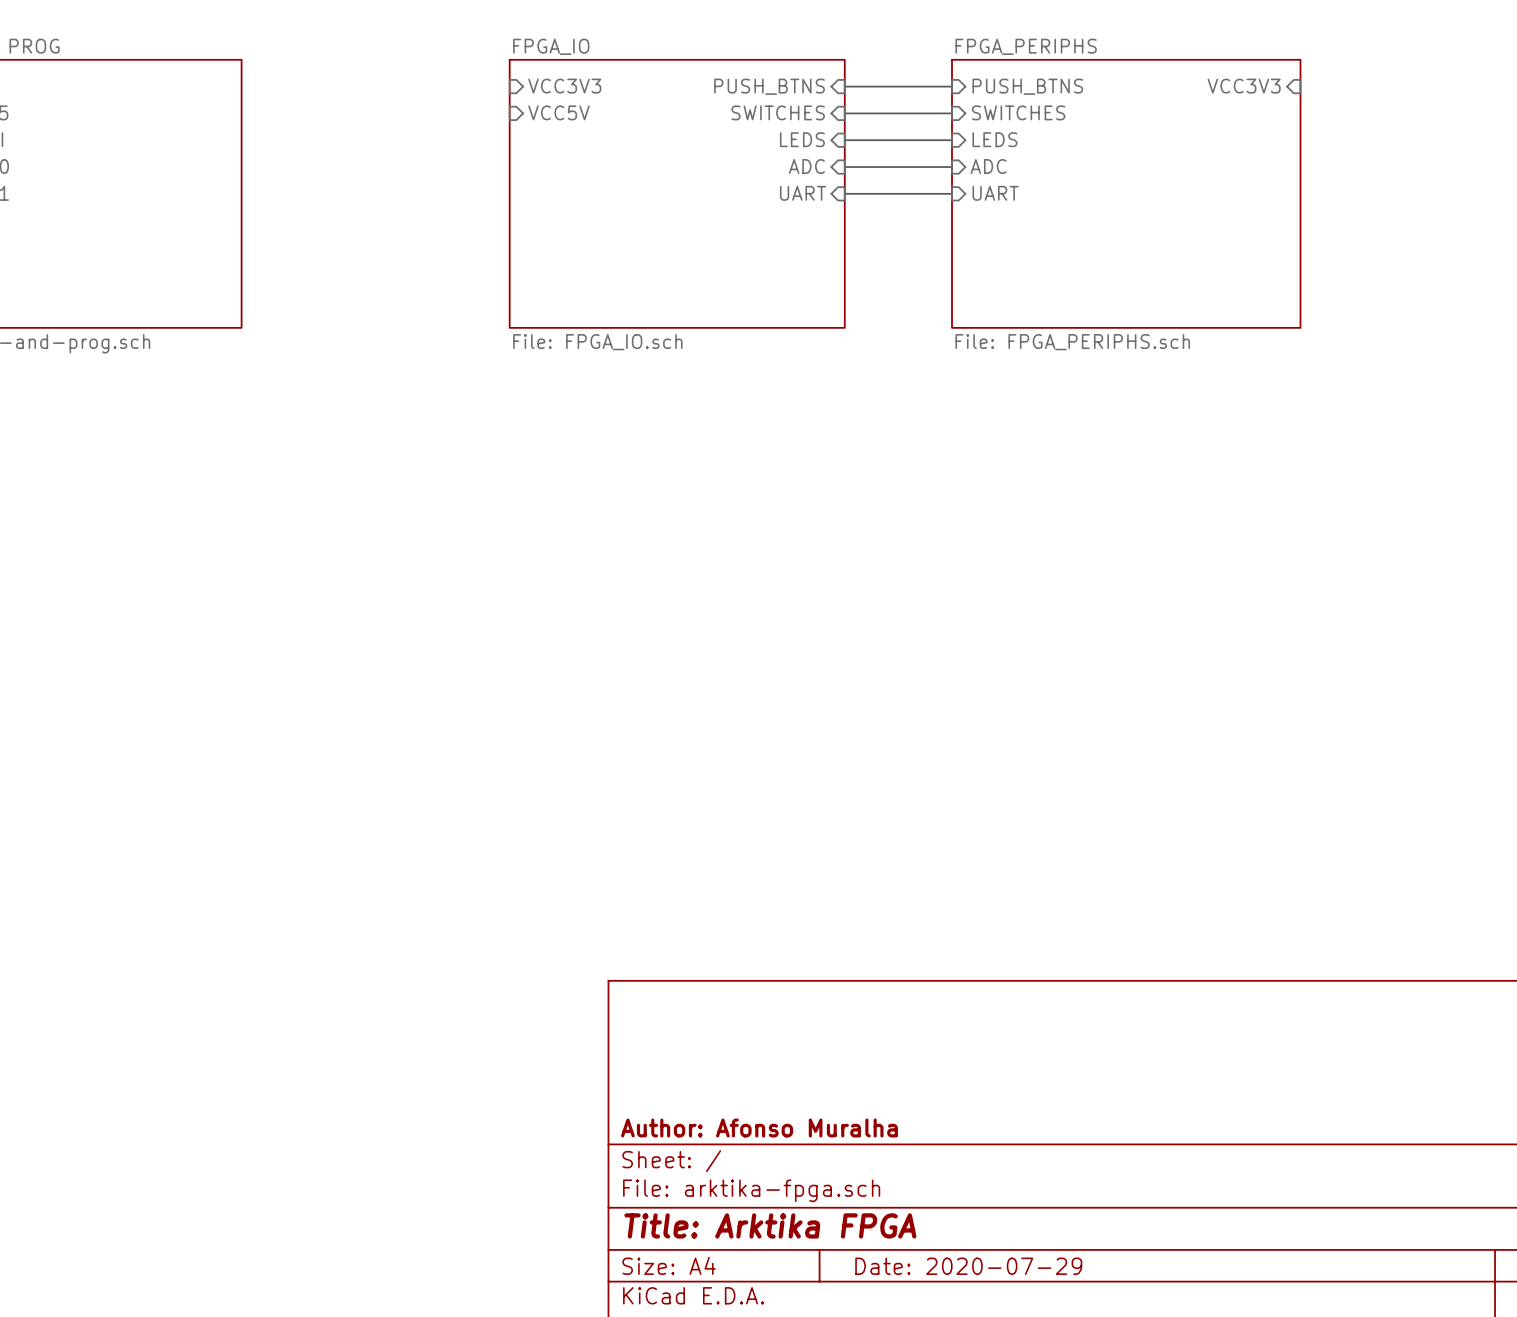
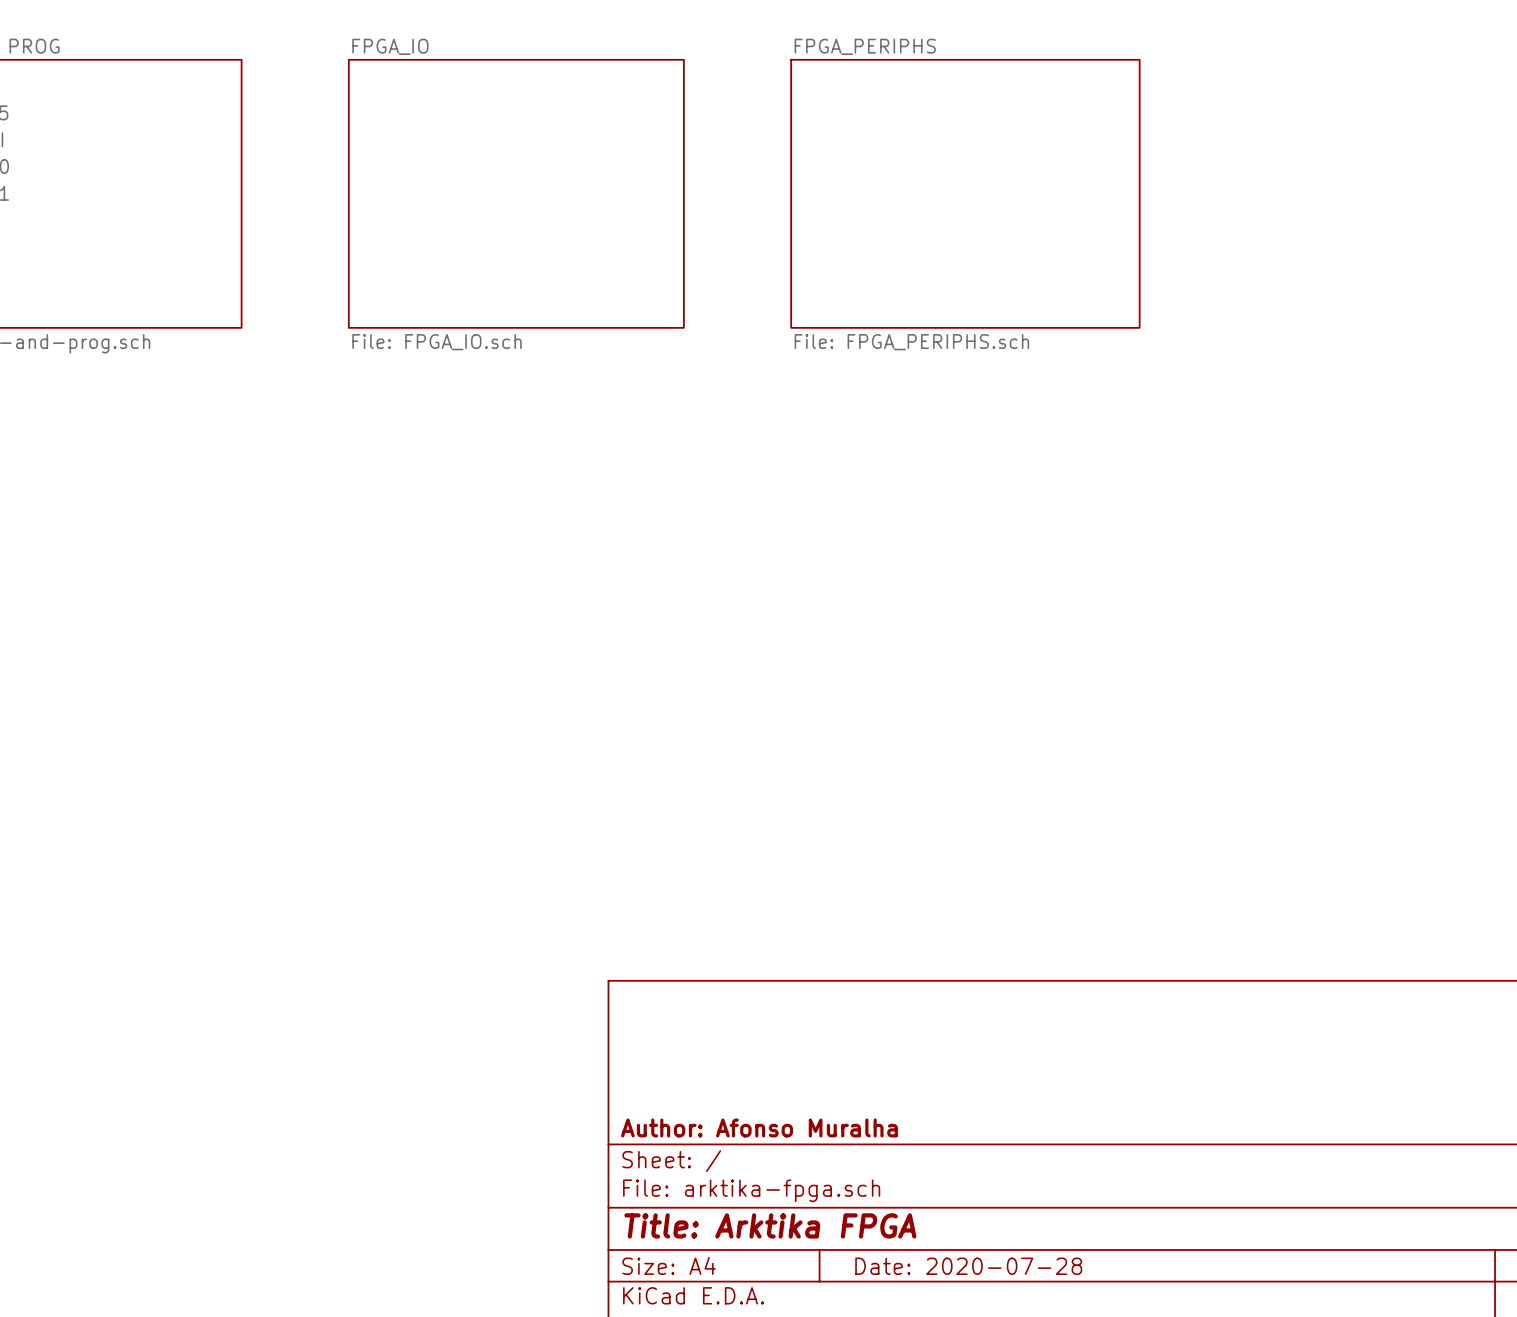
sheet pin: VCC3V3 (564, 86) -> none
sheet pin: PUSH_BTNS (769, 86) -> none
bus: (844, 86) (951, 86) -> none
sheet pin: PUSH_BTNS (1027, 86) -> none
sheet pin: VCC3V3 (1244, 86) -> none
sheet pin: VCC5V (559, 112) -> none
sheet pin: SWITCHES (778, 112) -> none
sheet pin: SWITCHES (1018, 112) -> none
bus: (844, 113) (951, 113) -> none
sheet pin: LEDS (802, 139) -> none
sheet pin: LEDS (994, 139) -> none
bus: (844, 140) (951, 140) -> none
sheet pin: ADC (806, 166) -> none
sheet pin: ADC (988, 166) -> none
bus: (844, 167) (951, 167) -> none
sheet FPGA_IO position: (677, 193) -> (516, 193)
sheet pin: UART (803, 193) -> none
bus: (844, 193) (951, 193) -> none
sheet pin: UART (995, 193) -> none
sheet FPGA_PERIPHS position: (1126, 193) -> (965, 193)
title block: Date: 2020-07-29 (968, 1266) -> Date: 2020-07-28 (968, 1266)

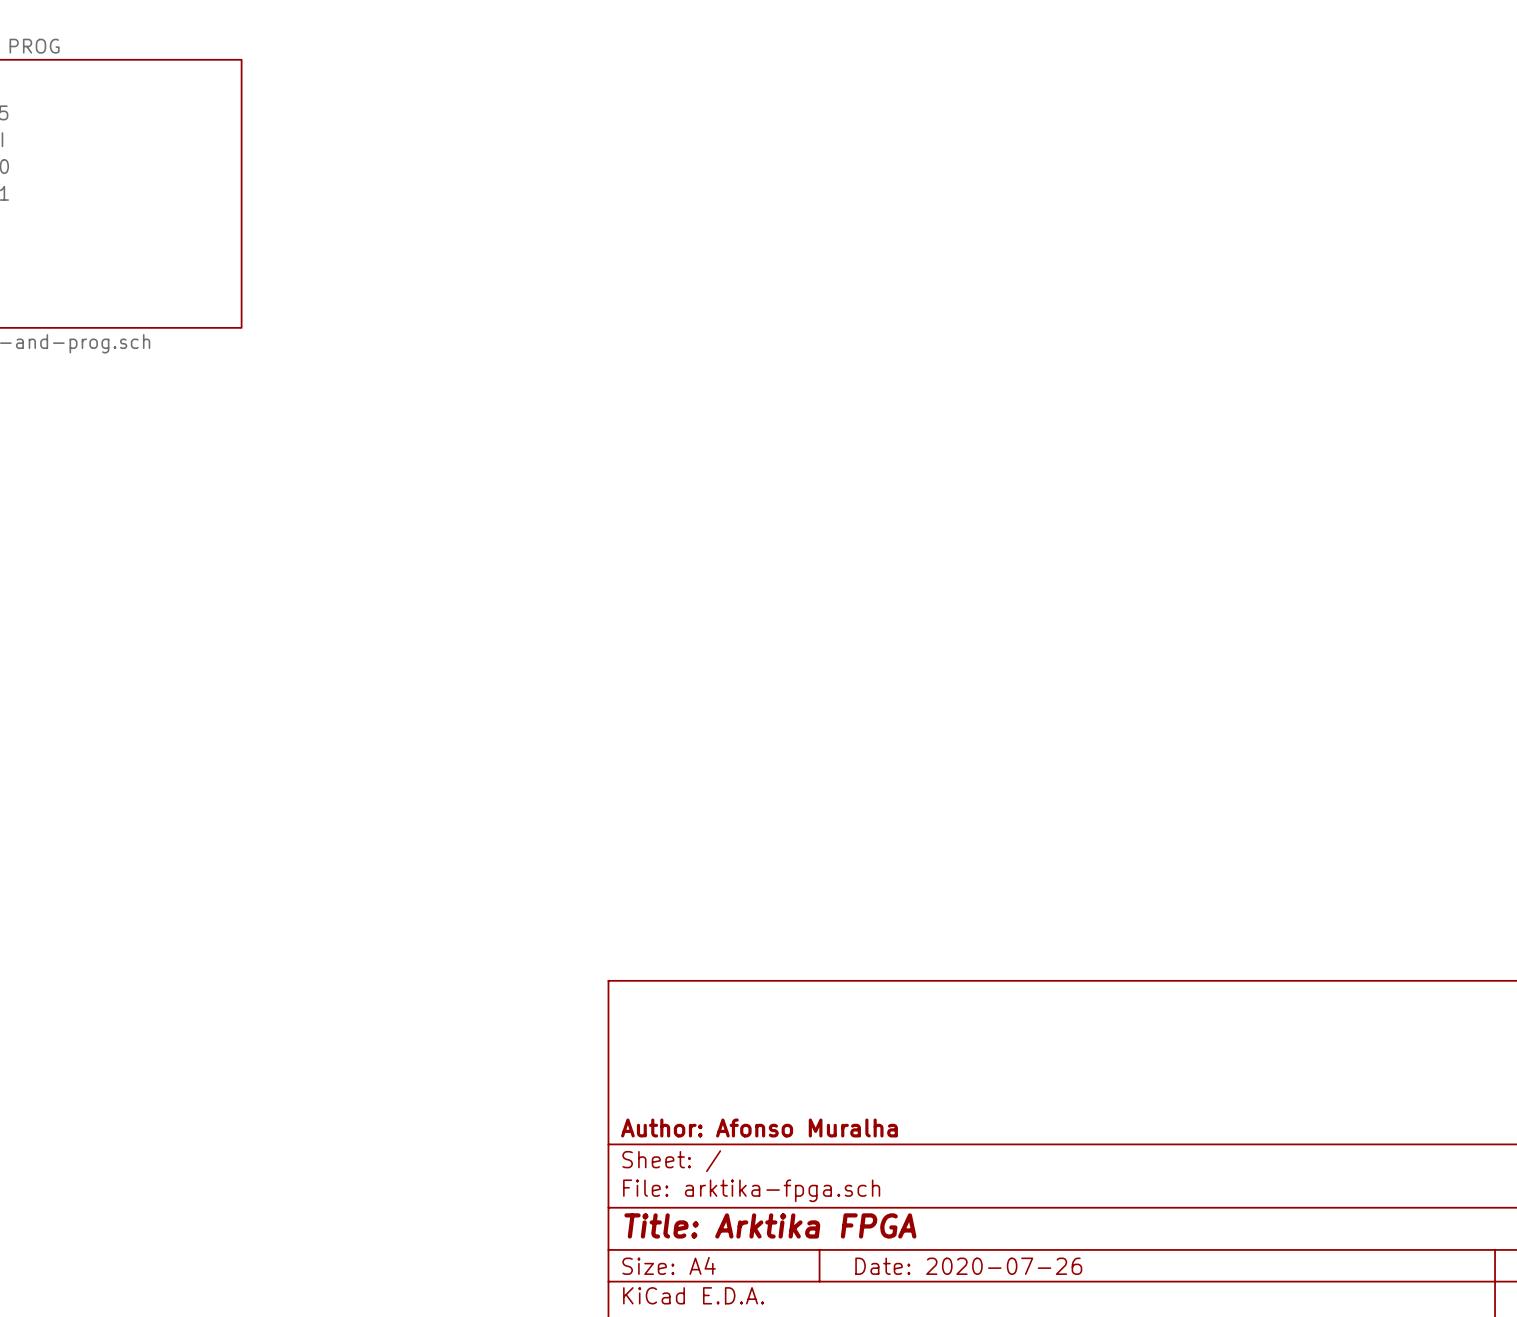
sheet FPGA_IO: File: FPGA_IO.sch (516, 193) -> none
sheet FPGA_PERIPHS: File: FPGA_PERIPHS.sch (965, 193) -> none
title block: Date: 2020-07-28 (968, 1266) -> Date: 2020-07-26 (968, 1266)

